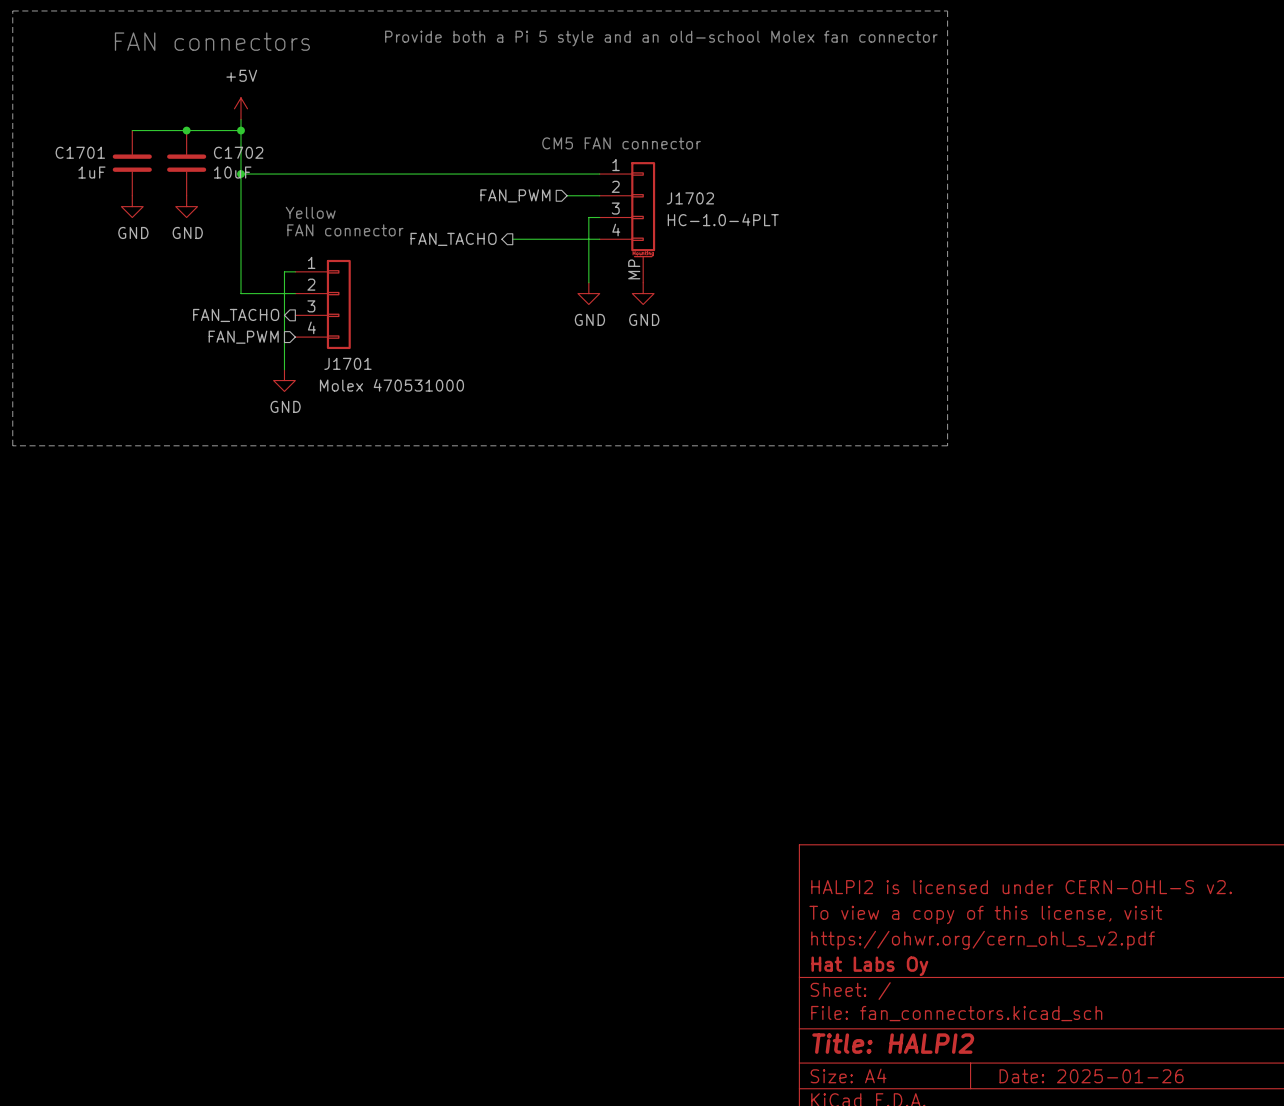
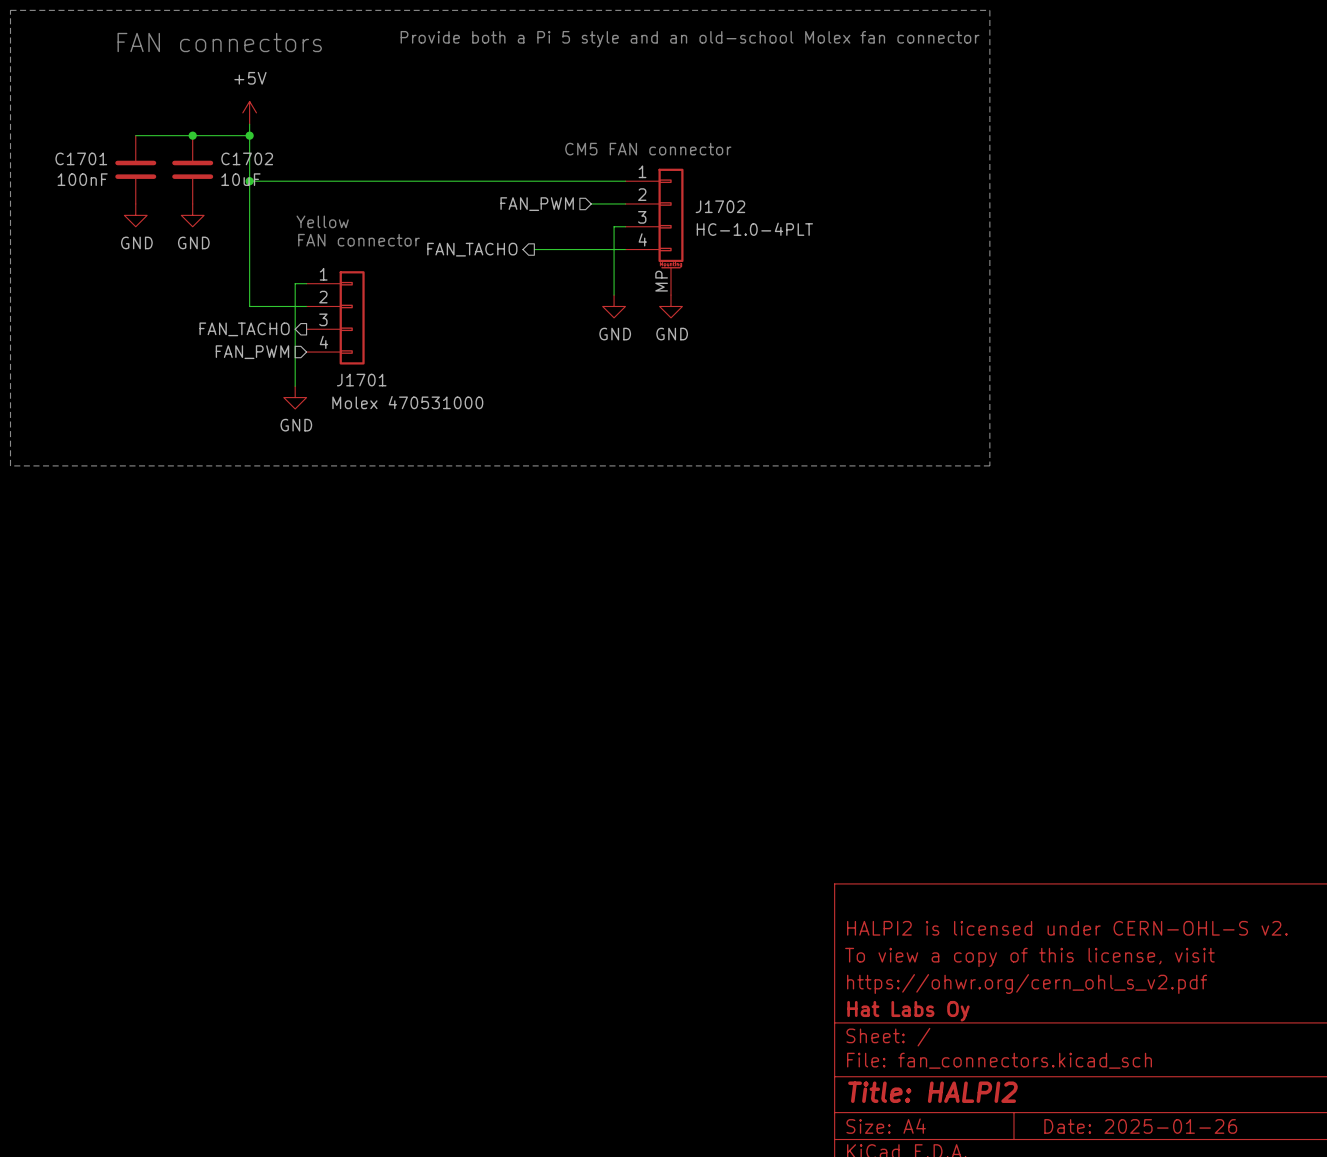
C1701 value: 1uF (91, 172) -> 100nF (82, 179)

